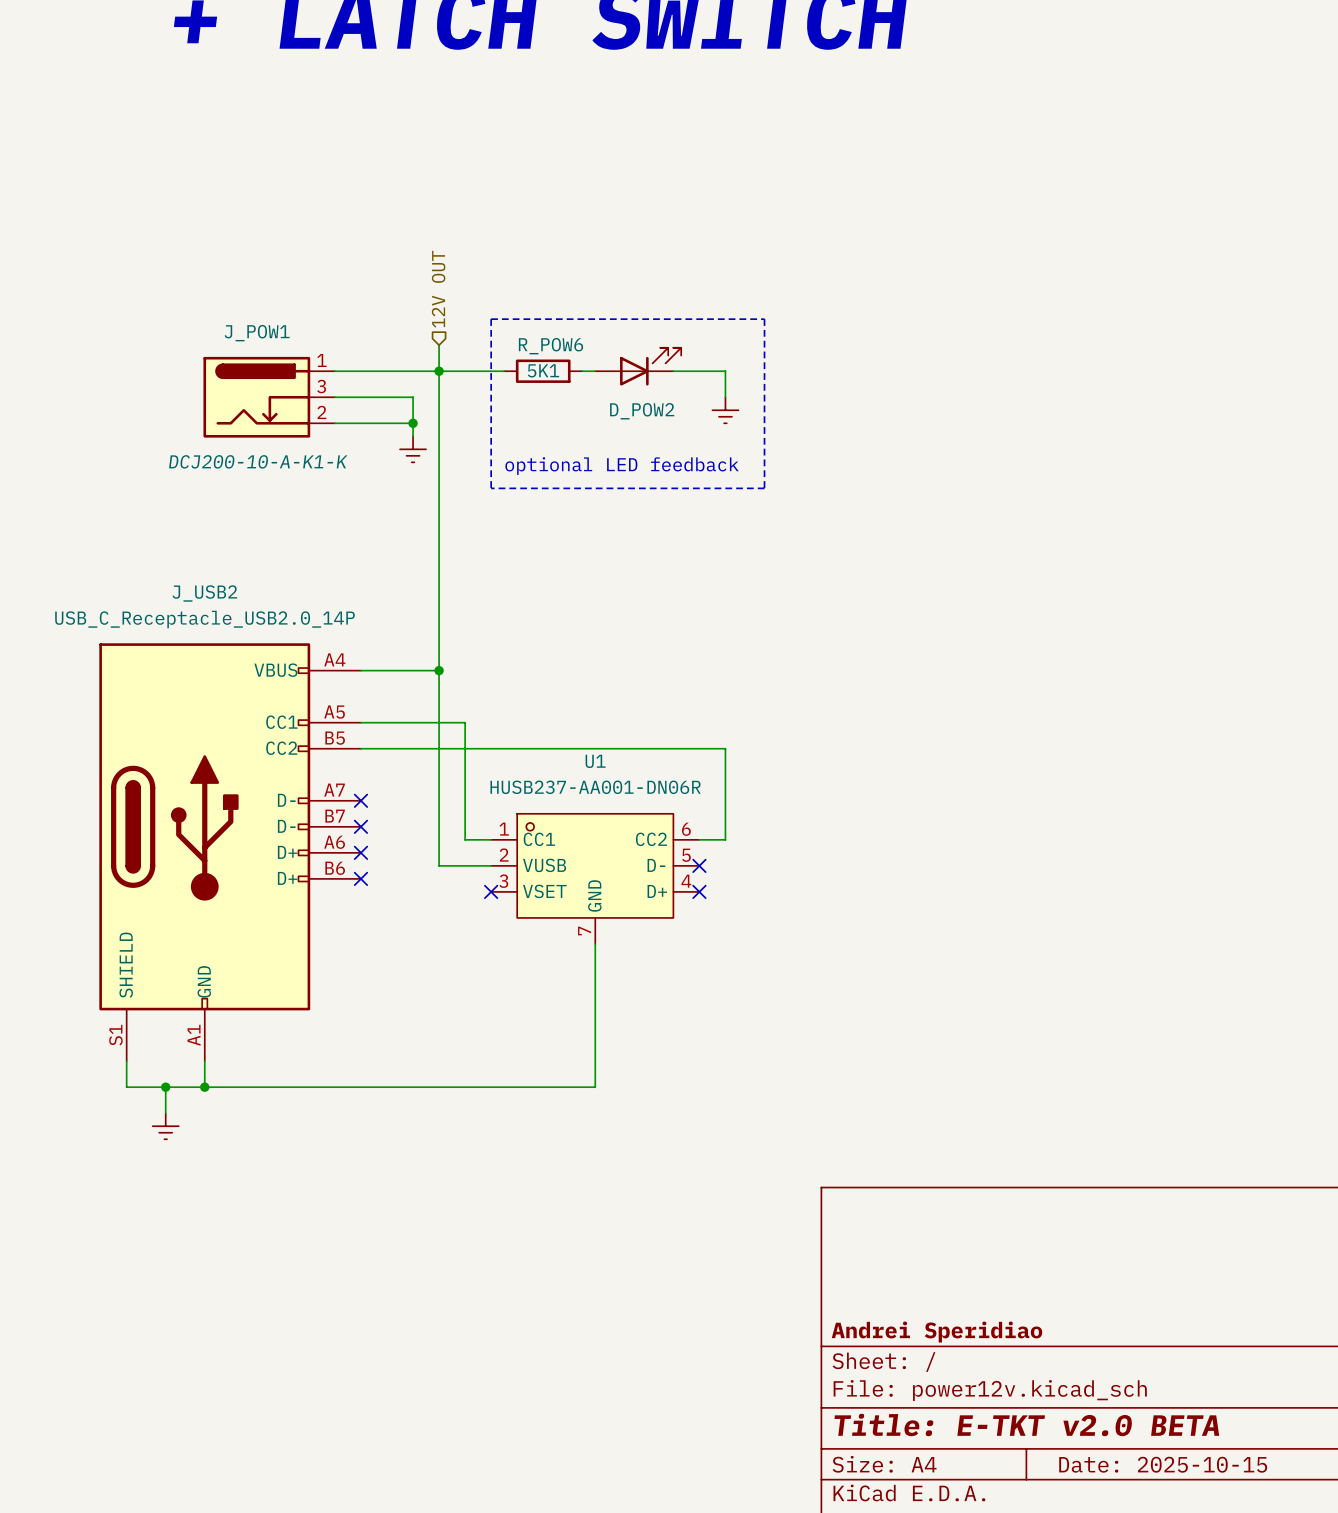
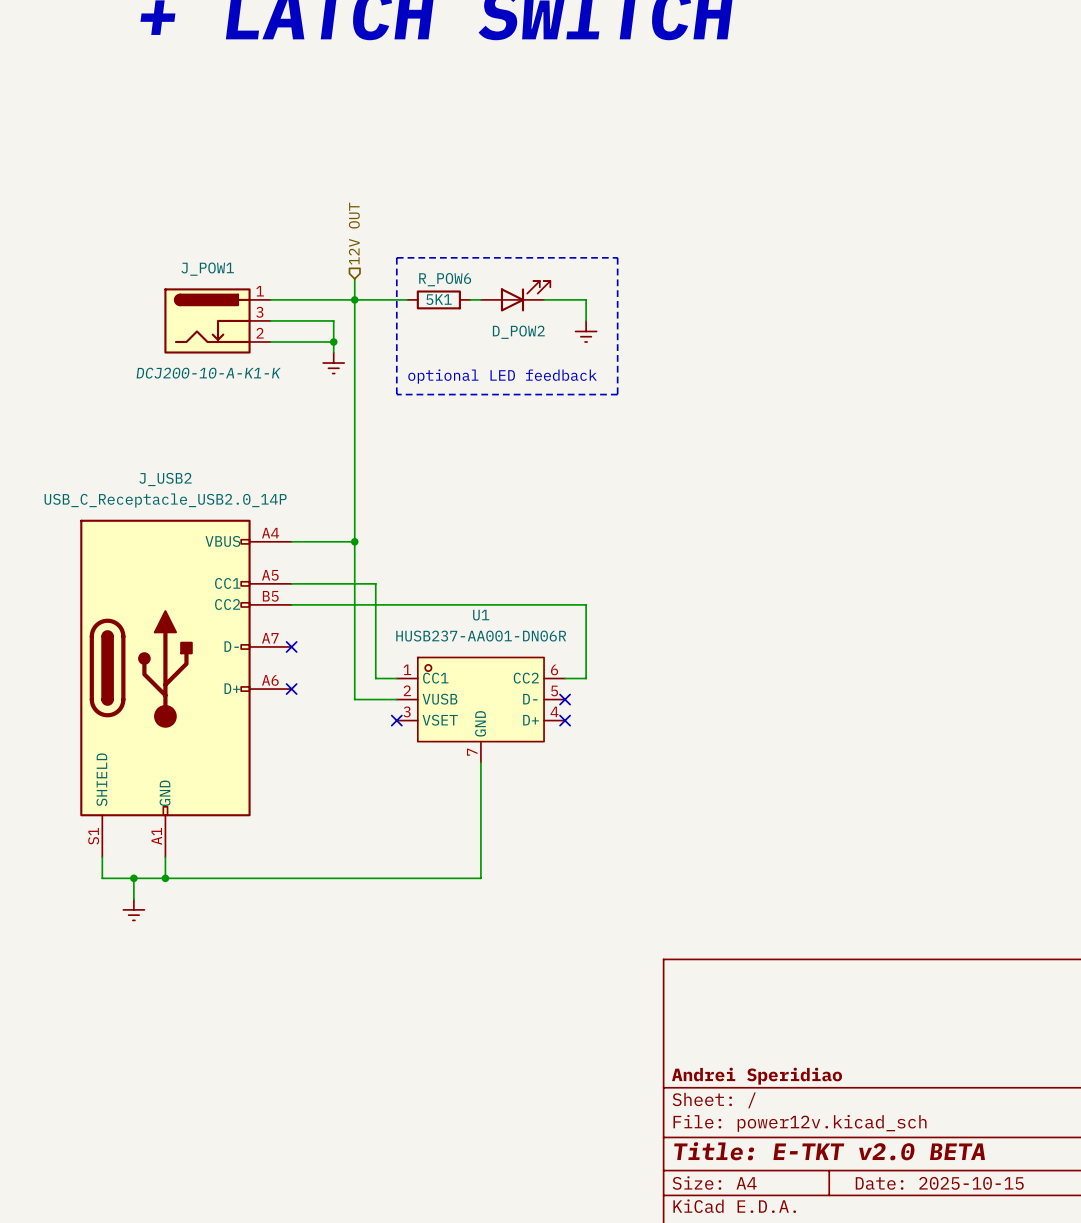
J_USB2 symbol: [99, 643, 361, 1062] -> [80, 519, 292, 858]
no-connect mark: (360, 826) -> none
no-connect mark: (360, 878) -> none

